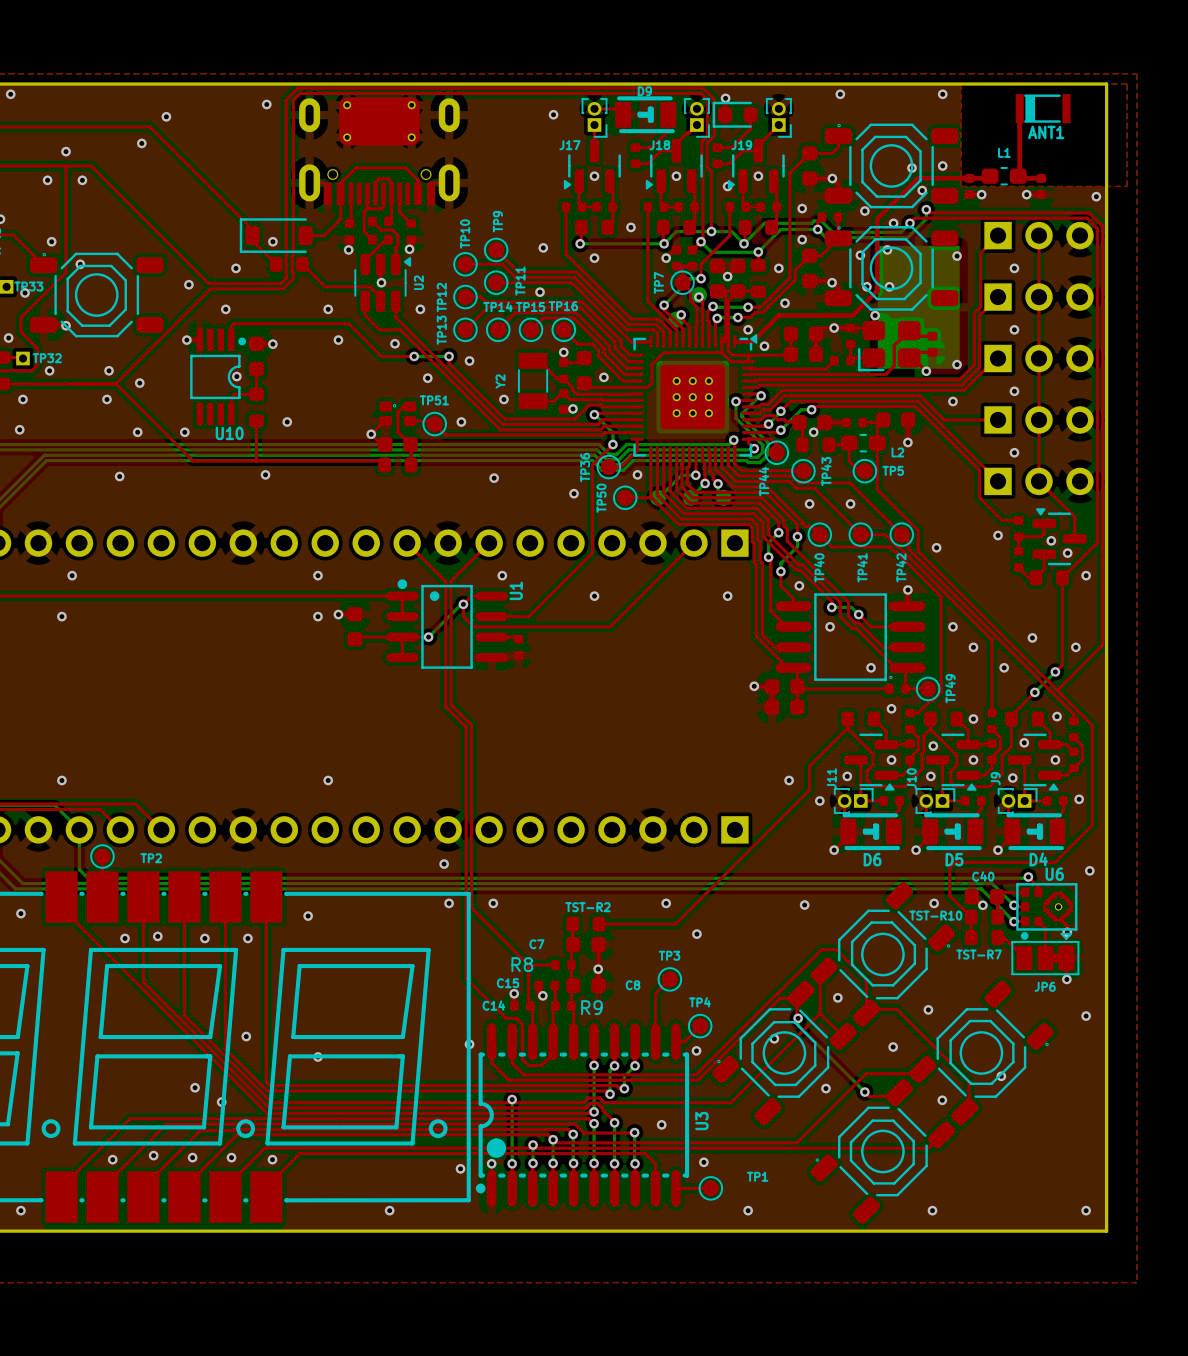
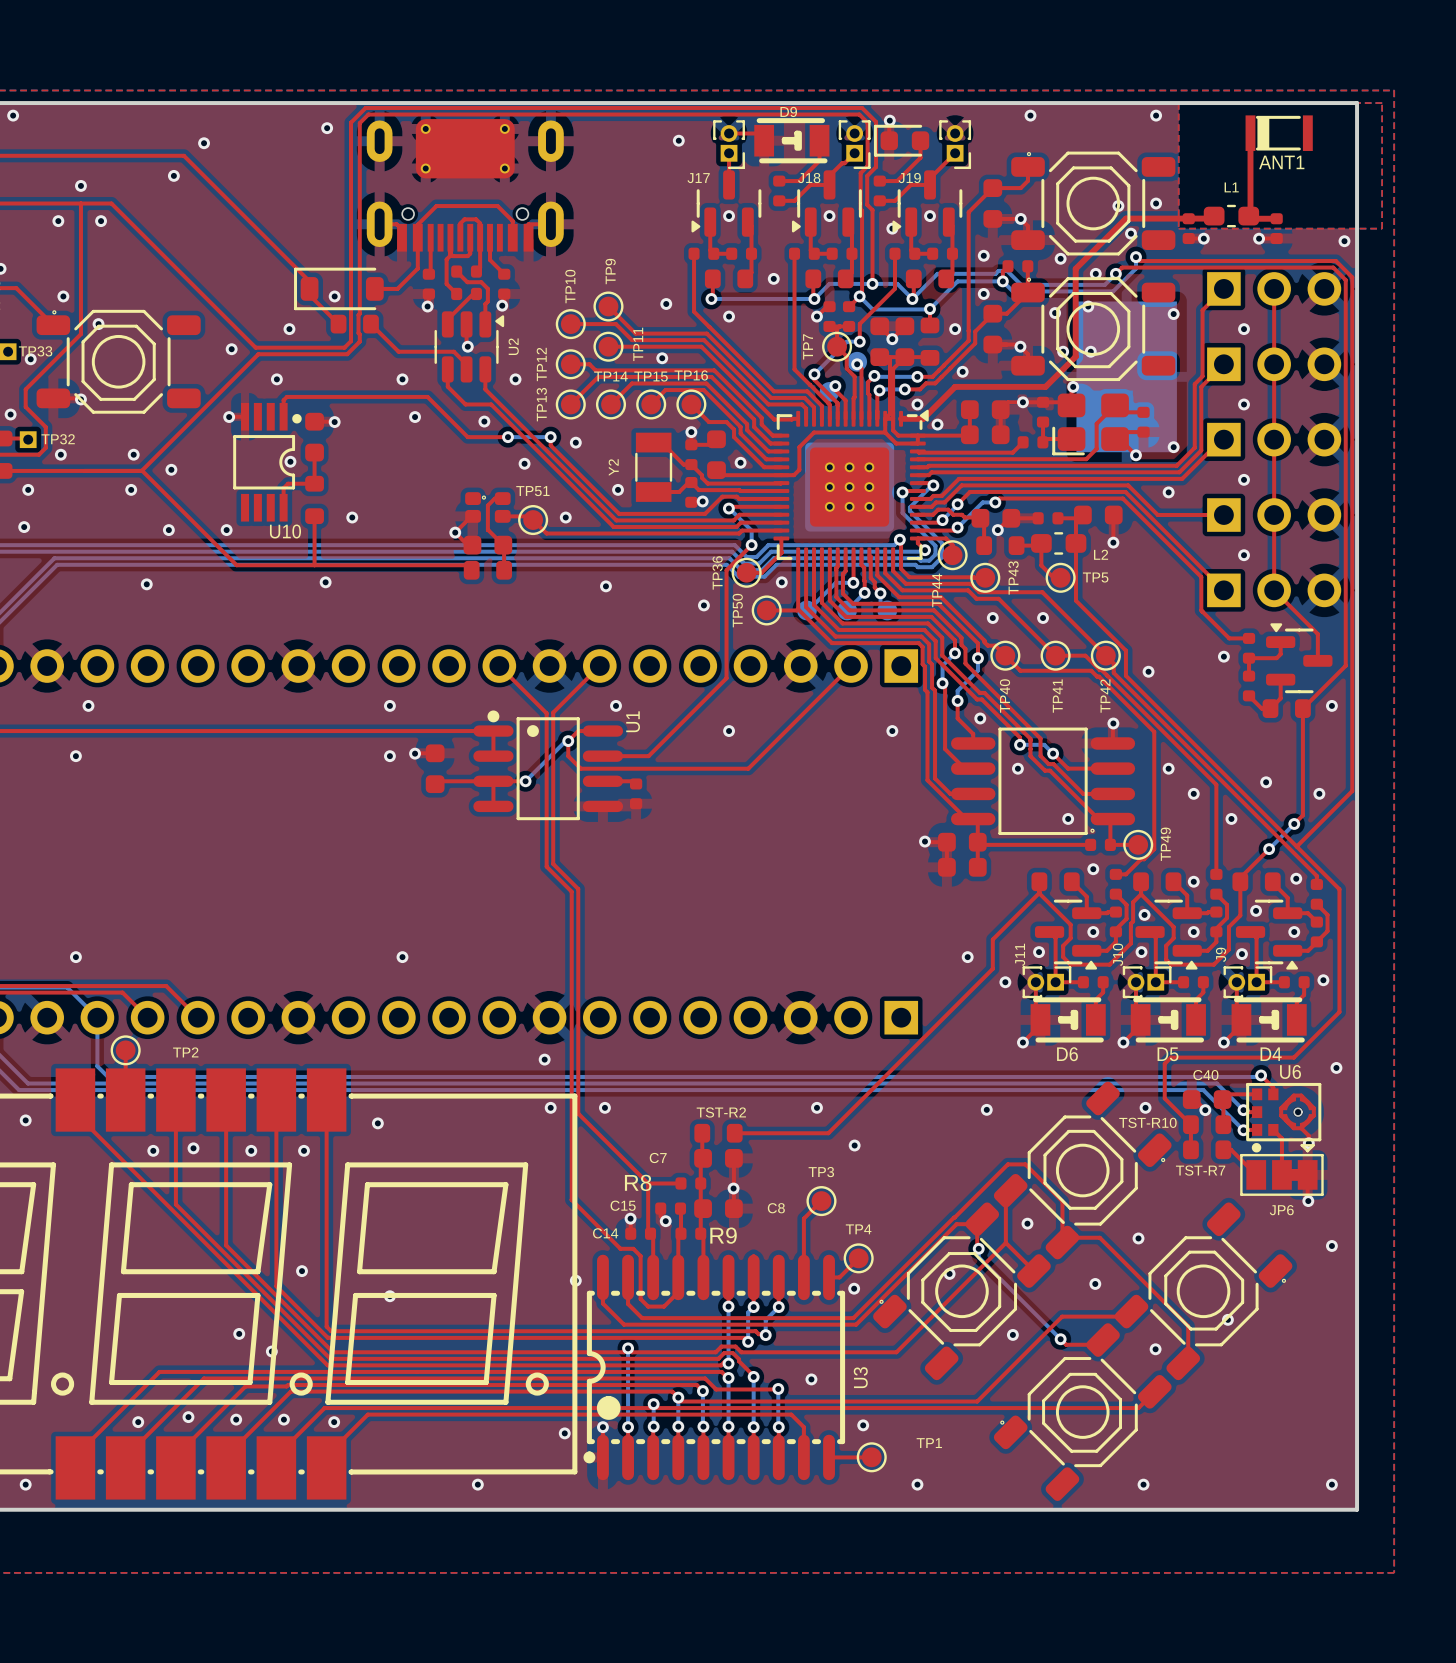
via: (1051, 540) -> none
via: (1067, 553) -> none

